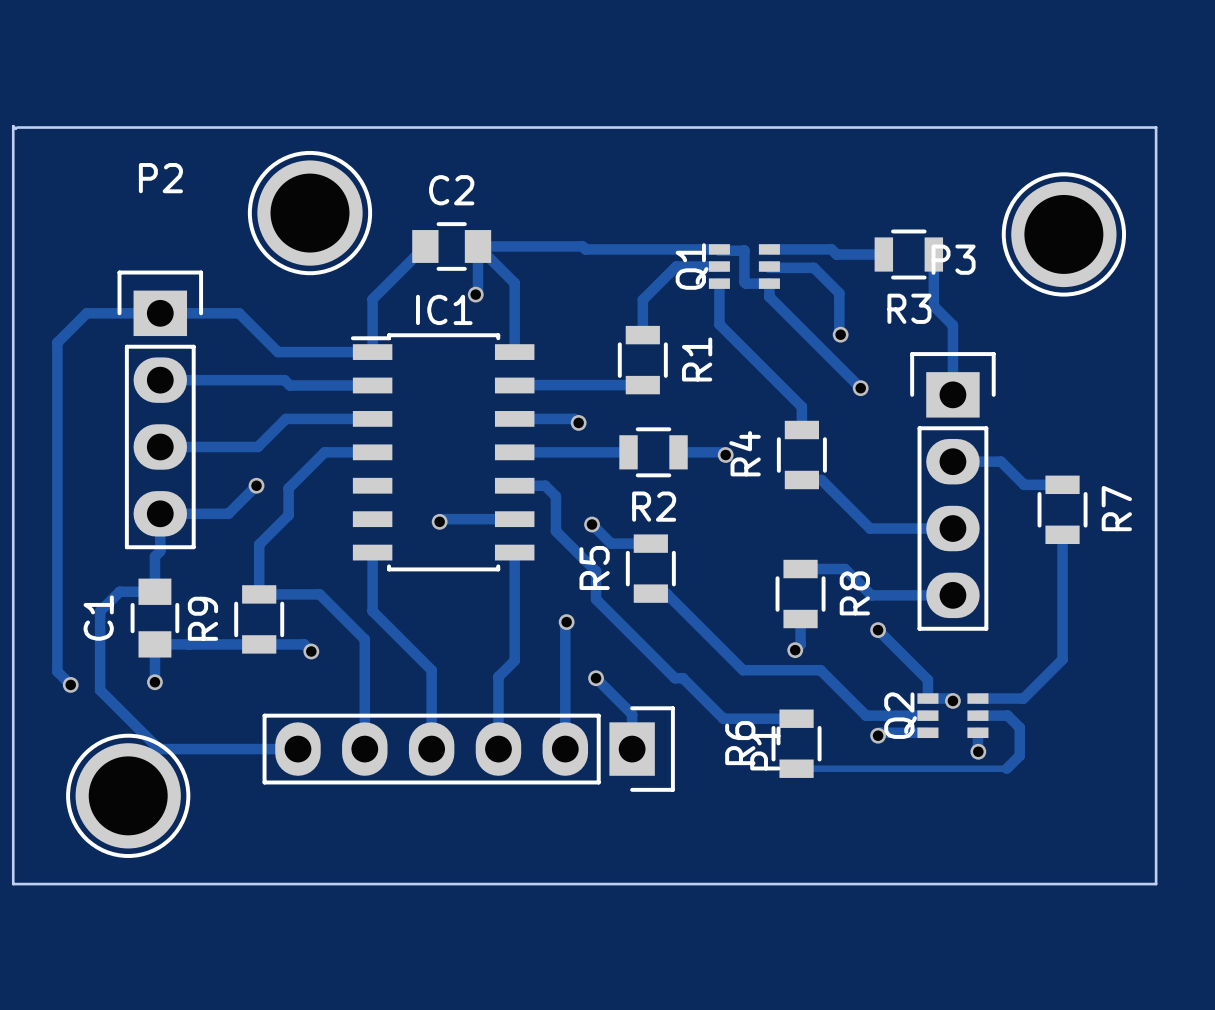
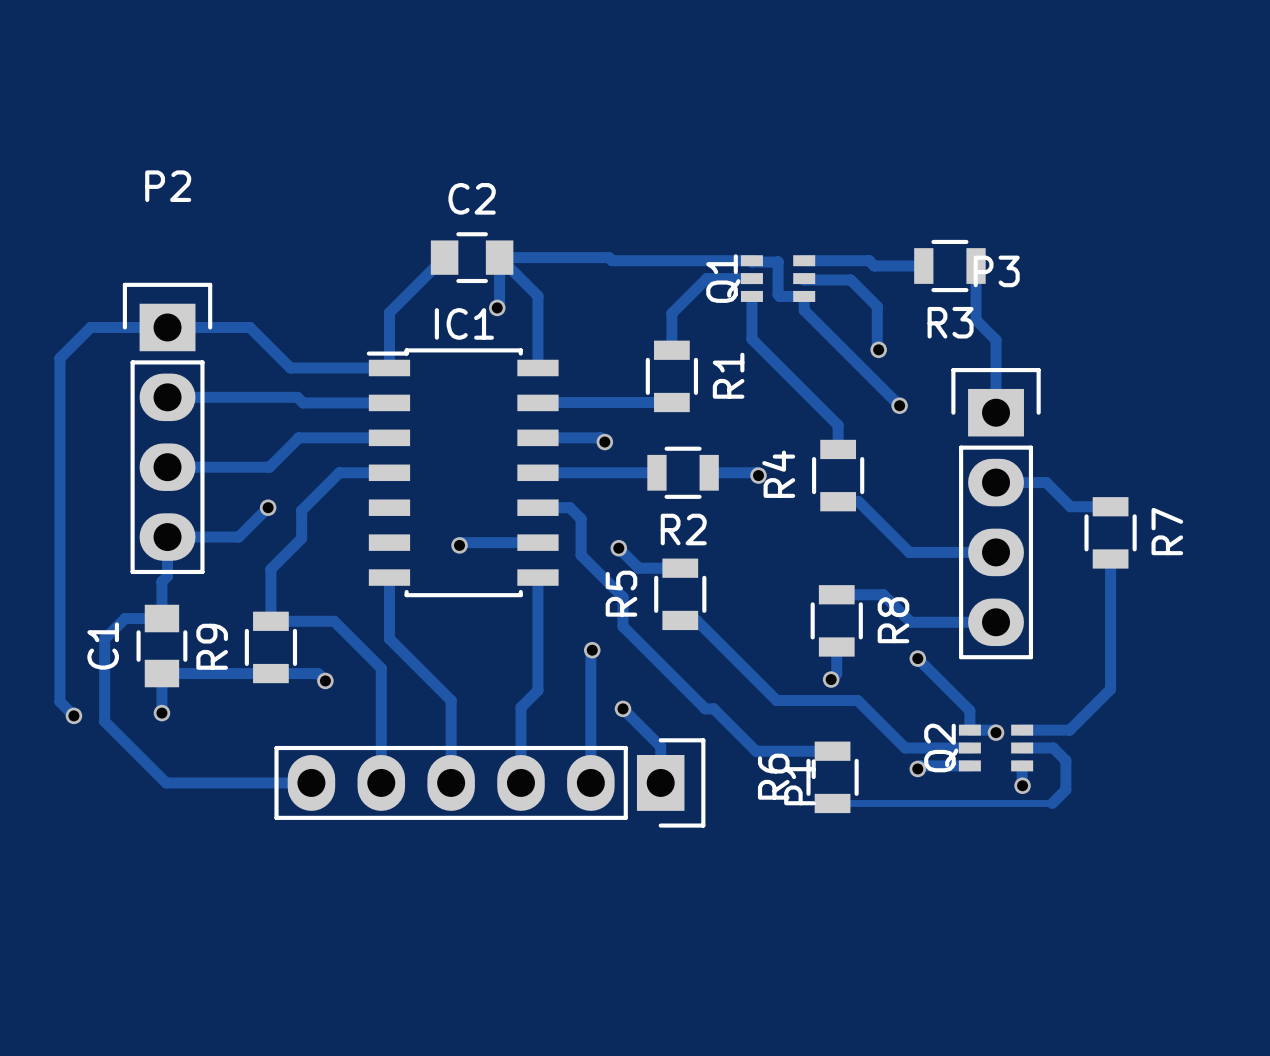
board edge: (17, 127) (1156, 127) (1156, 884) (13, 884) (13, 126) (15, 128) -> none
part: (310, 213) -> none
part: (1063, 234) -> none
part: (128, 795) -> none

